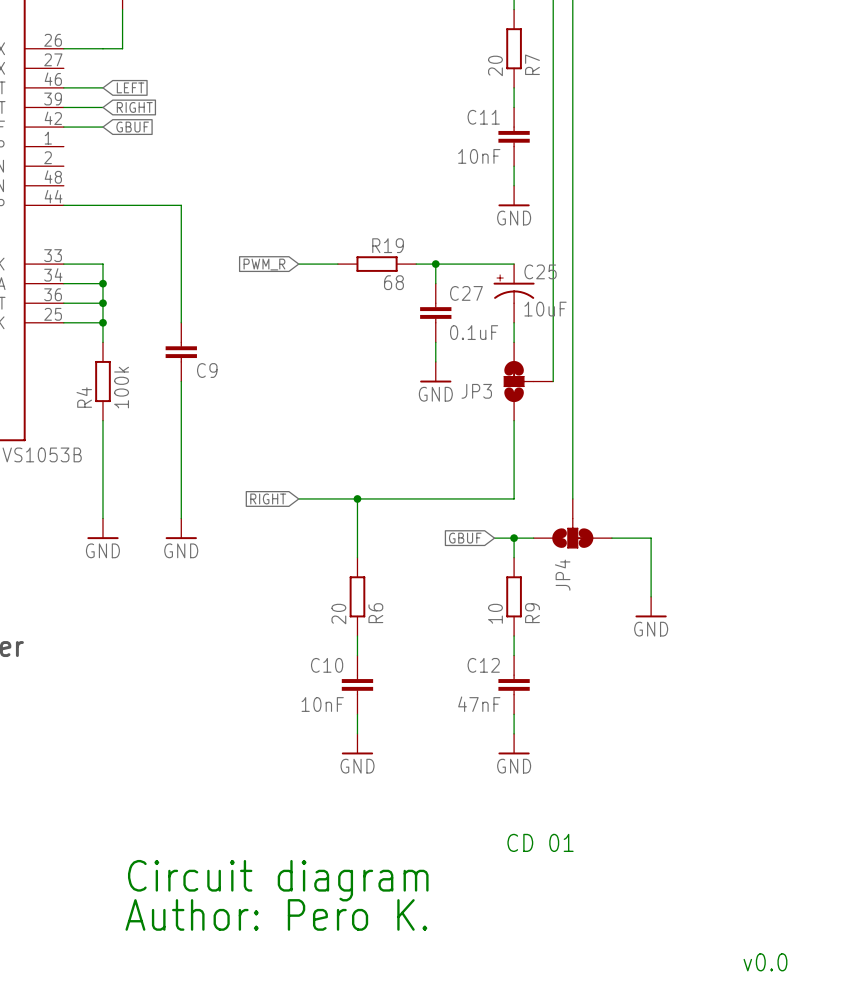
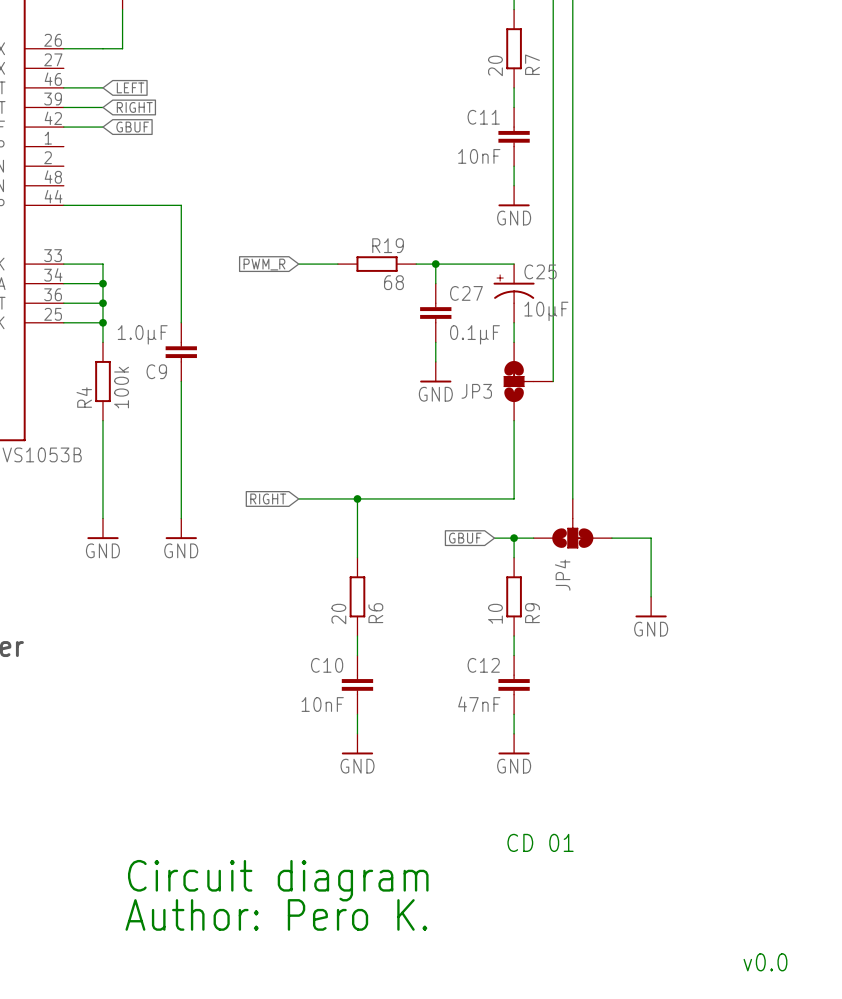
C25 value: 10uF (545, 309) -> 10µF (546, 311)
C27 value: 0.1uF (474, 332) -> 0.1µF (474, 334)
C9 value: none -> 1.0µF (142, 334)
C9 name position: C9 (207, 370) -> C9 (156, 371)

